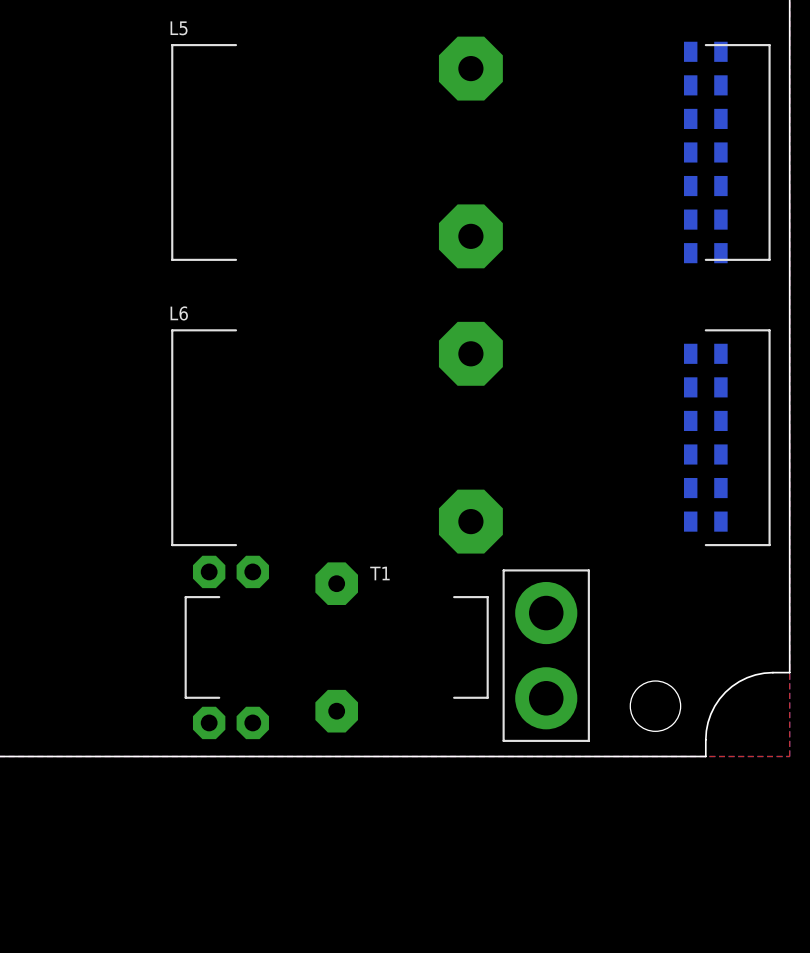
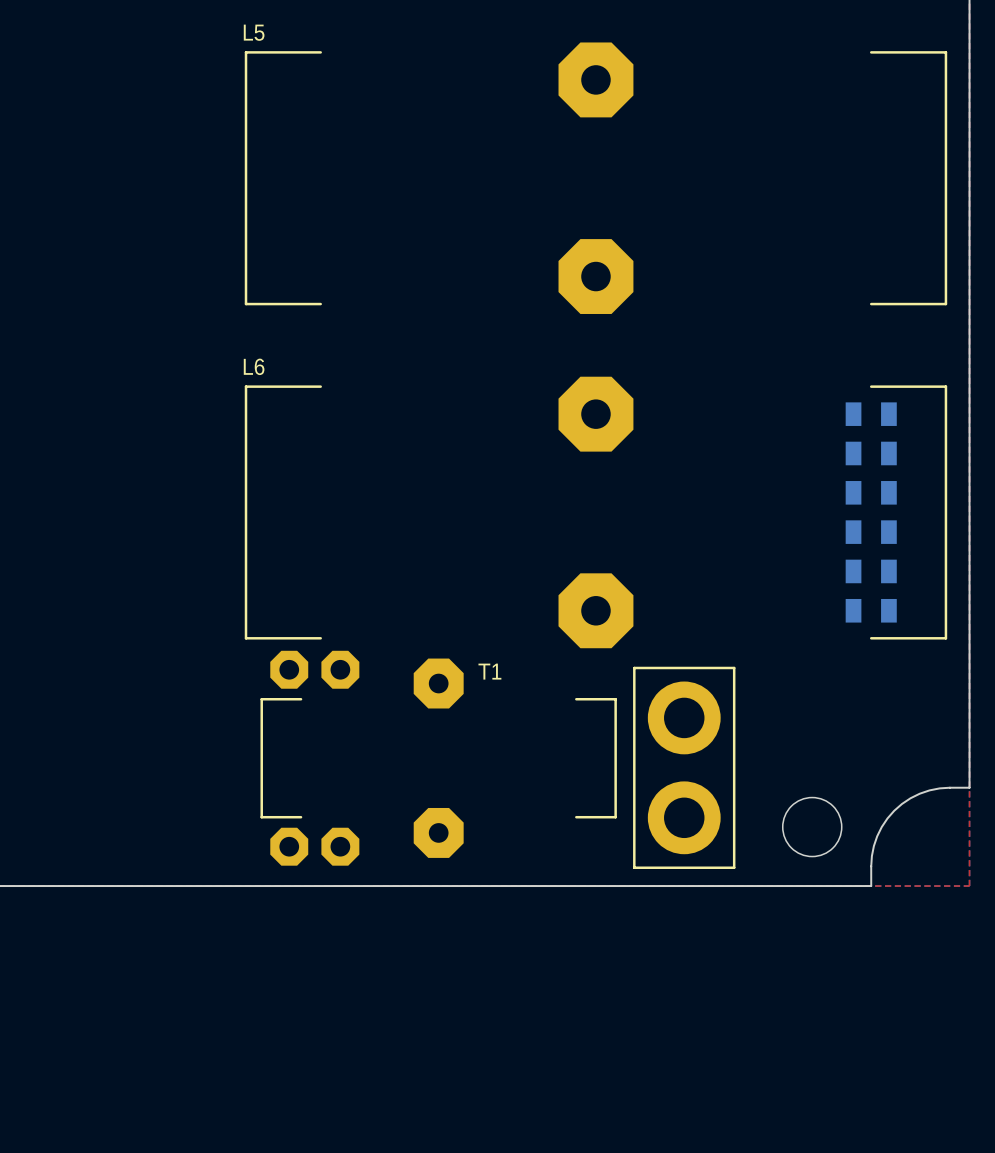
part: (705, 51) -> none
part: (705, 85) -> none
part: (705, 118) -> none
part: (705, 152) -> none
part: (705, 186) -> none
part: (705, 219) -> none
part: (705, 253) -> none

